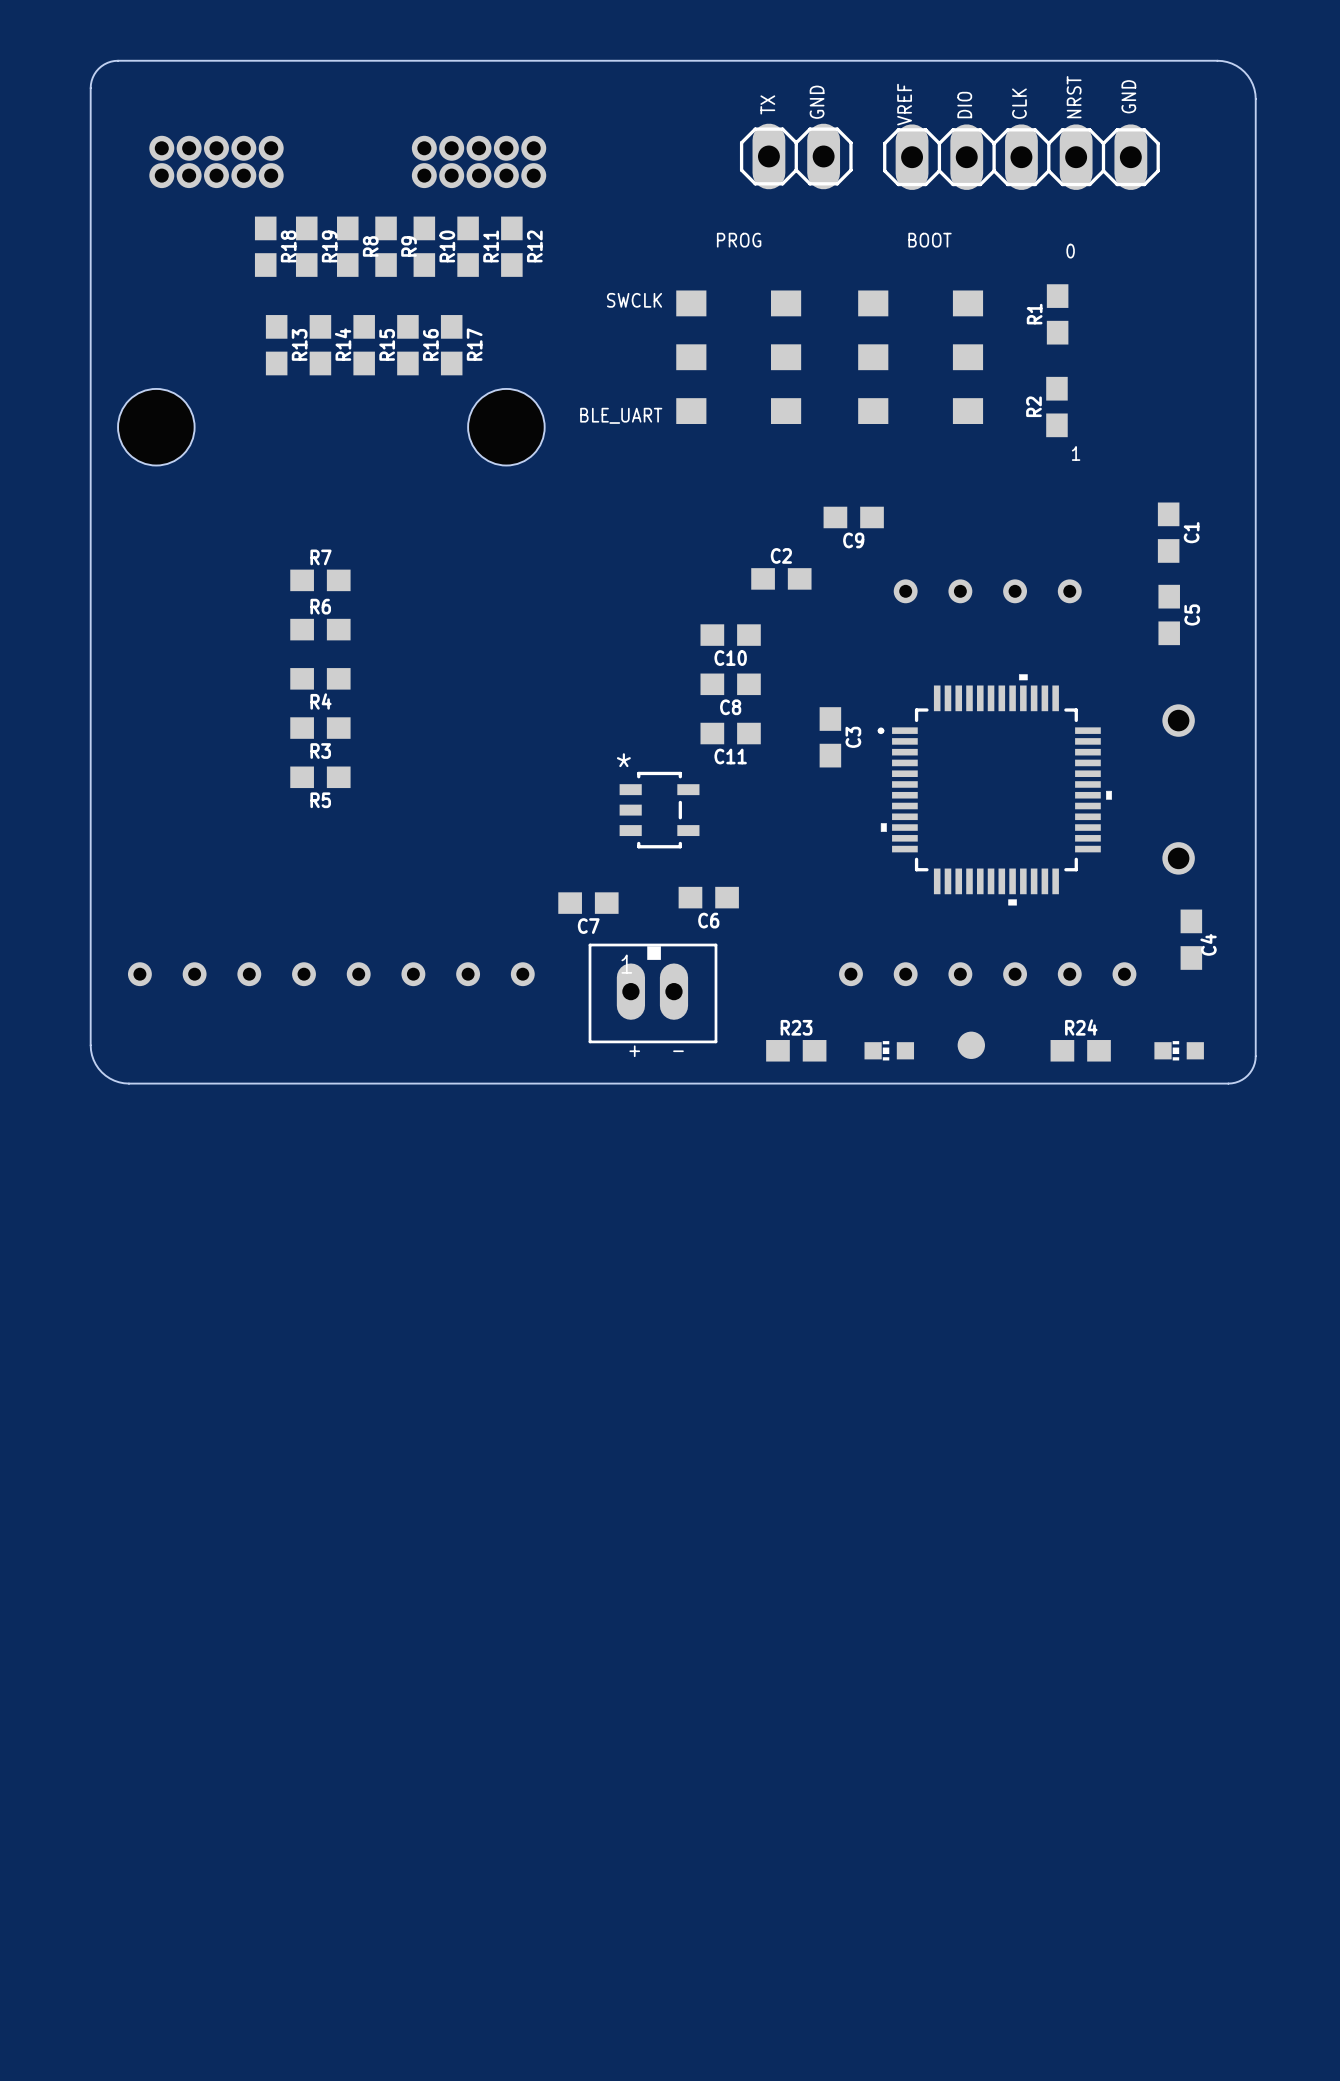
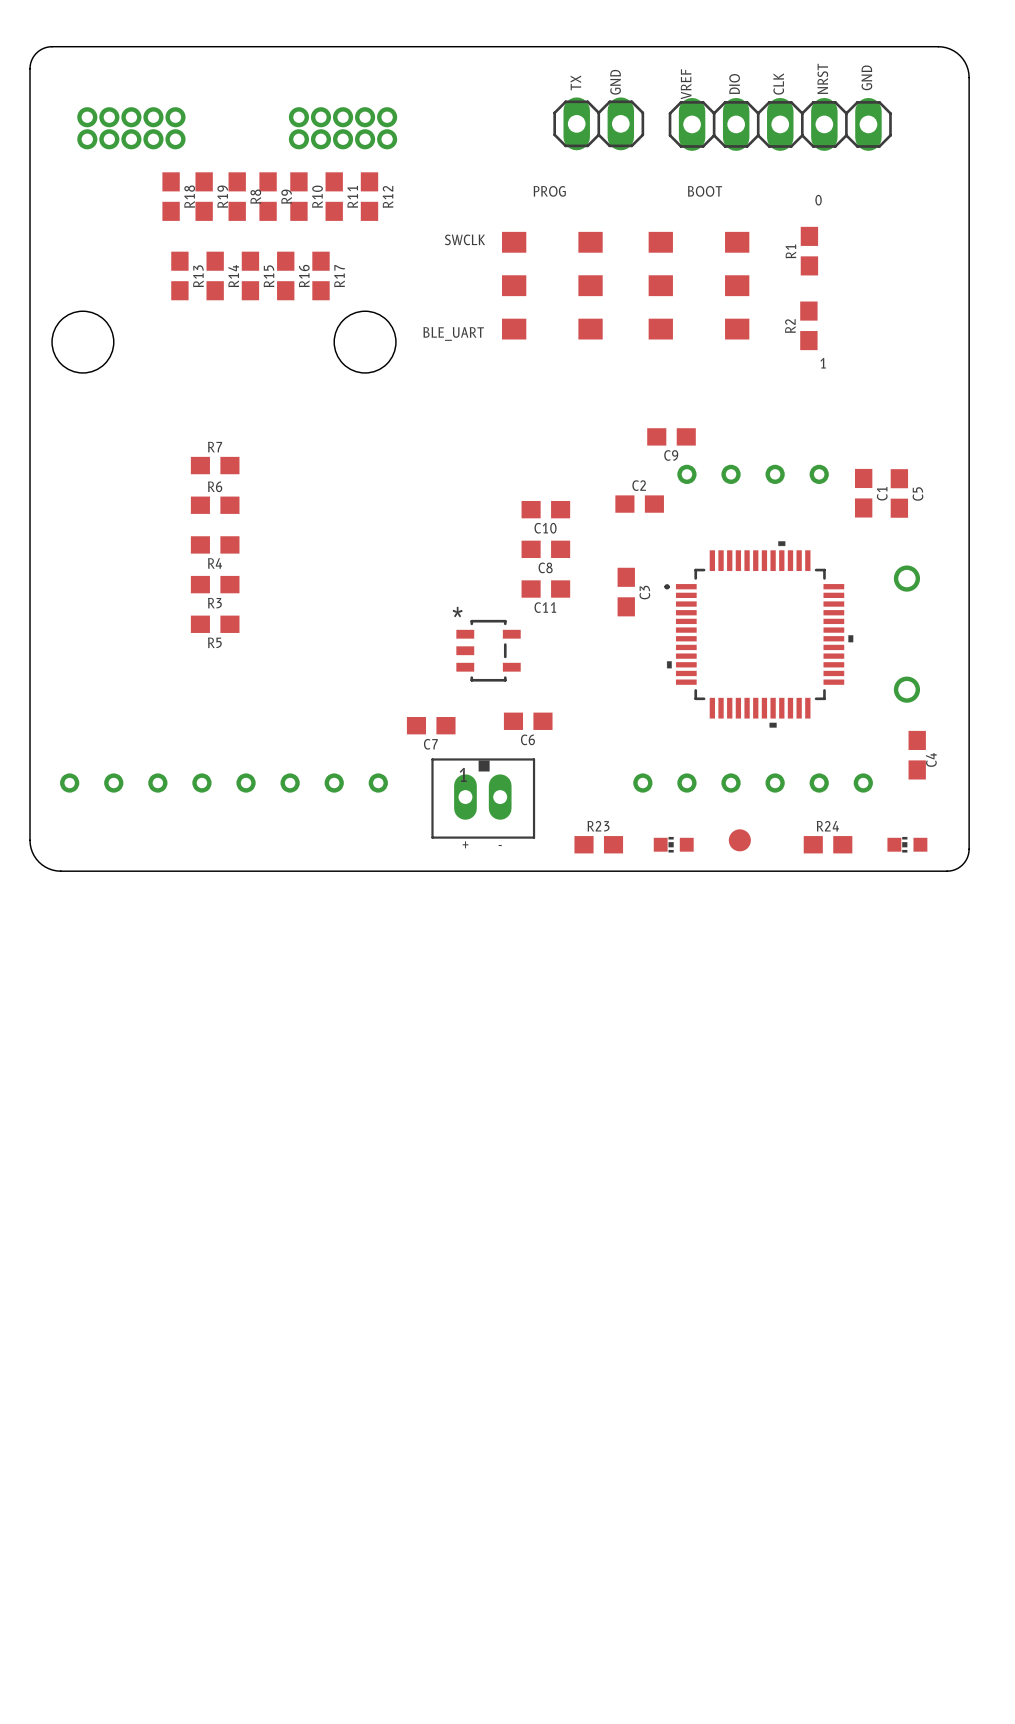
C9 position: (853, 517) -> (671, 436)
C1 position: (1168, 532) -> (863, 493)
C2 position: (781, 578) -> (639, 504)

